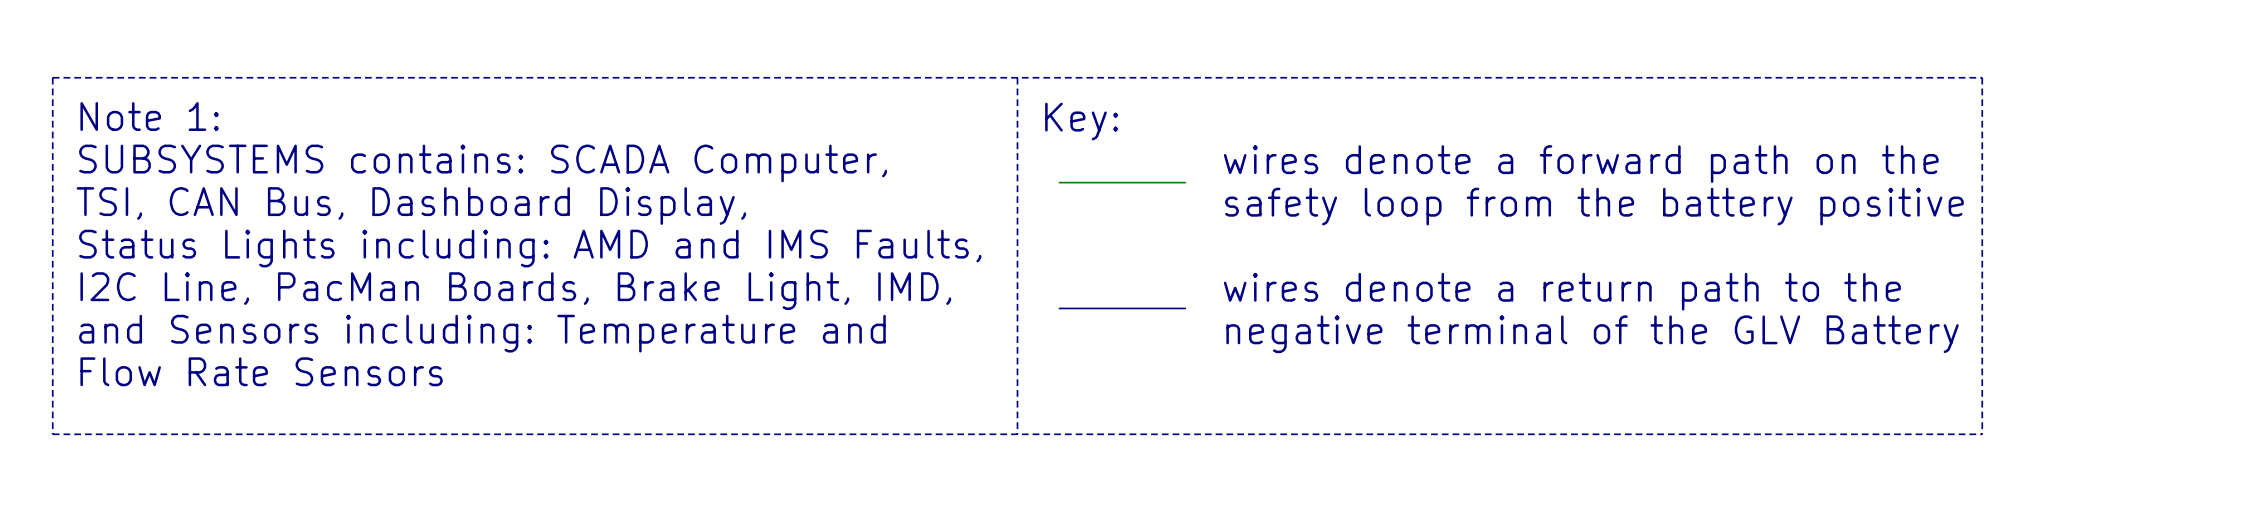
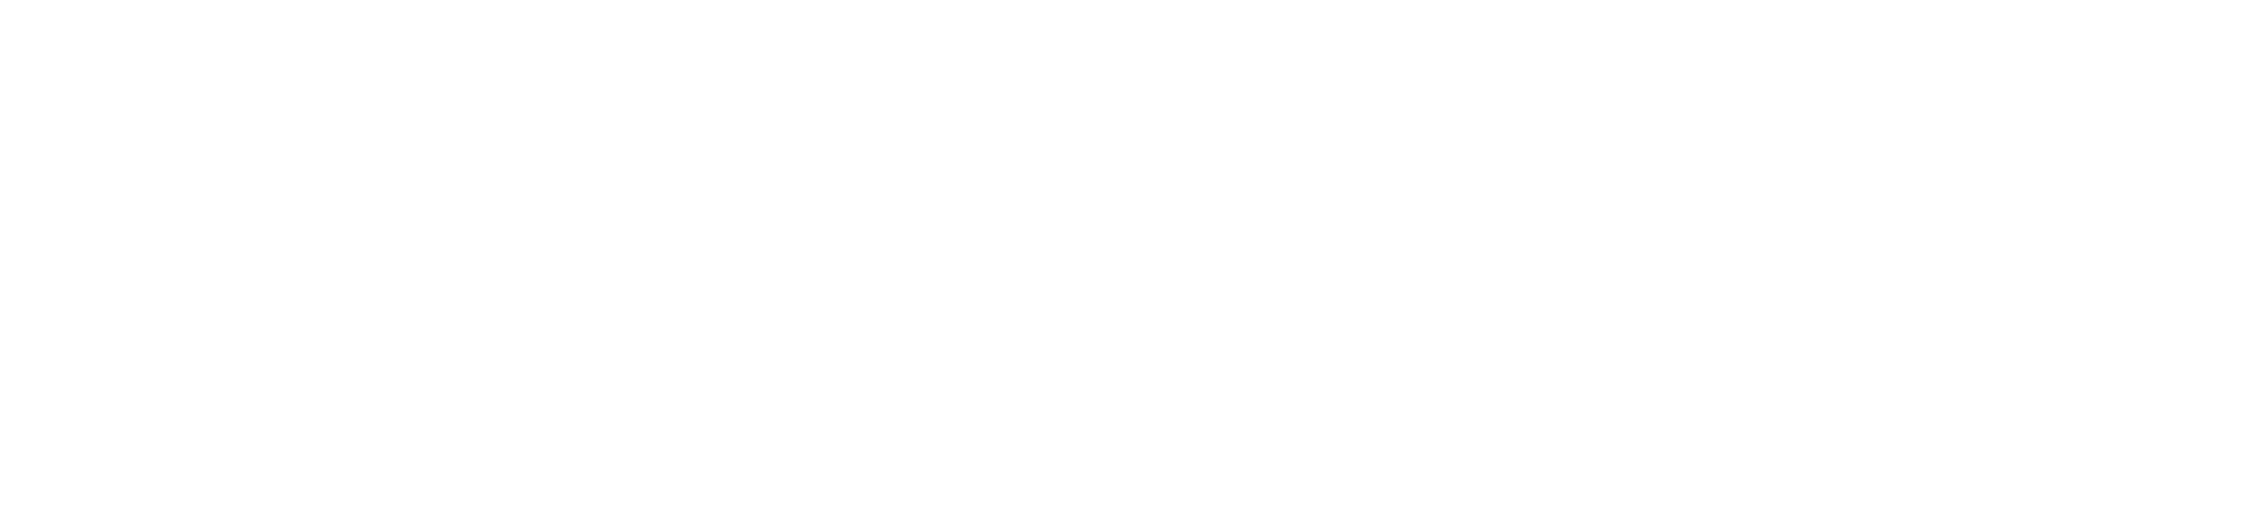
line: (52, 77) (52, 434) (1982, 434) (1982, 77) (52, 77) -> none
line: (1017, 77) (1017, 434) -> none
text: Note 1: (149, 116) -> none
text: Key: (1081, 121) -> none
text: SUBSYSTEMS contains: SCADA Computer, (483, 163) -> none
text: wires denote a forward path on the (1581, 164) -> none
wire: (1059, 182) (1185, 182) -> none
text: TSI, CAN Bus, Dashboard Display, (411, 206) -> none
text: safety loop from the battery positive (1594, 206) -> none
text: Status Lights including: AMD and IMS Faults, (530, 248) -> none
text: I2C Line, PacMan Boards, Brake Light, IMD, (515, 291) -> none
text: wires denote a return path to the (1562, 291) -> none
bus: (1059, 308) (1185, 308) -> none
text: and Sensors including: Temperature and (482, 333) -> none
text: negative terminal of the GLV Battery (1592, 334) -> none
text: Flow Rate Sensors (261, 371) -> none

